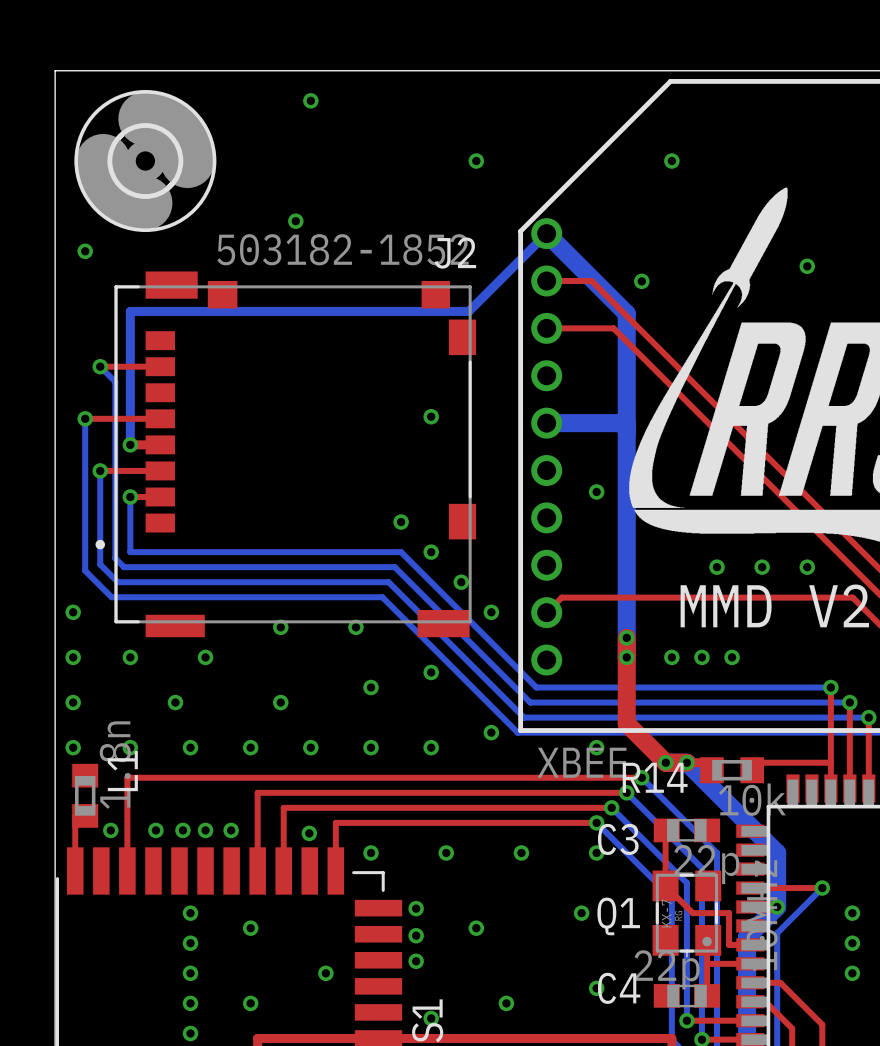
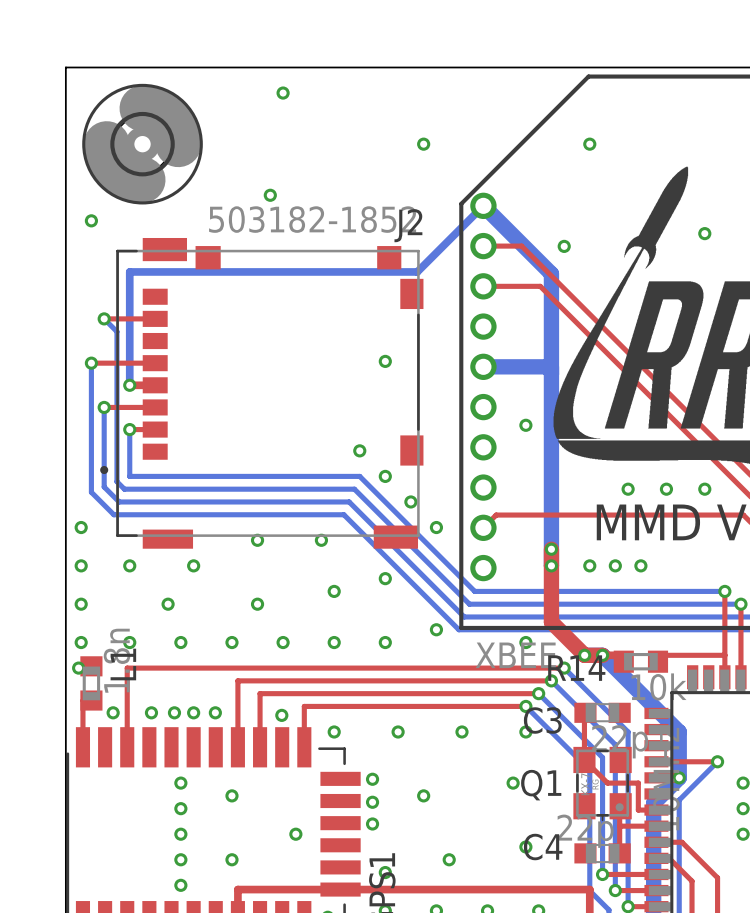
via: none -> (78, 668)

